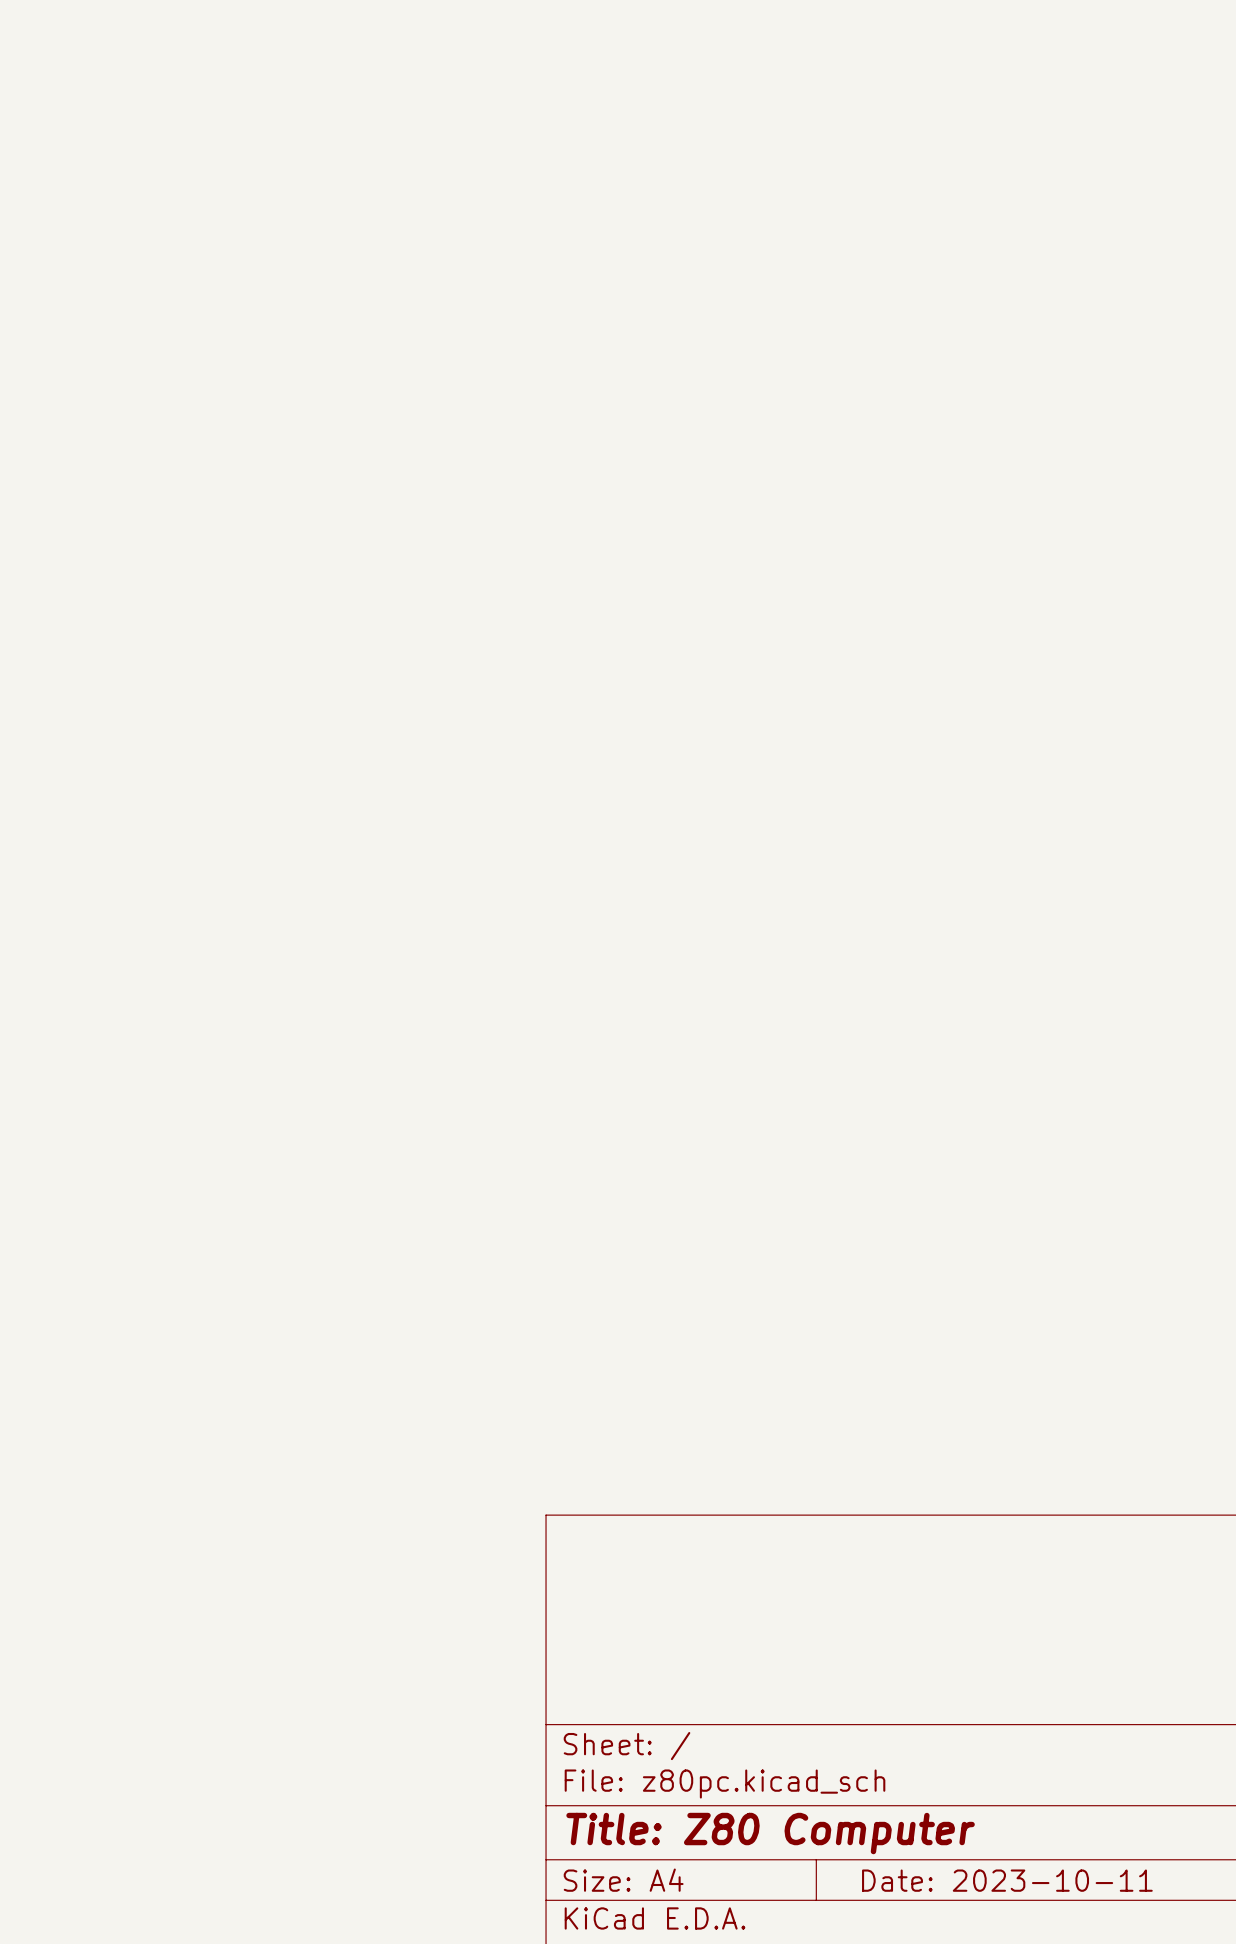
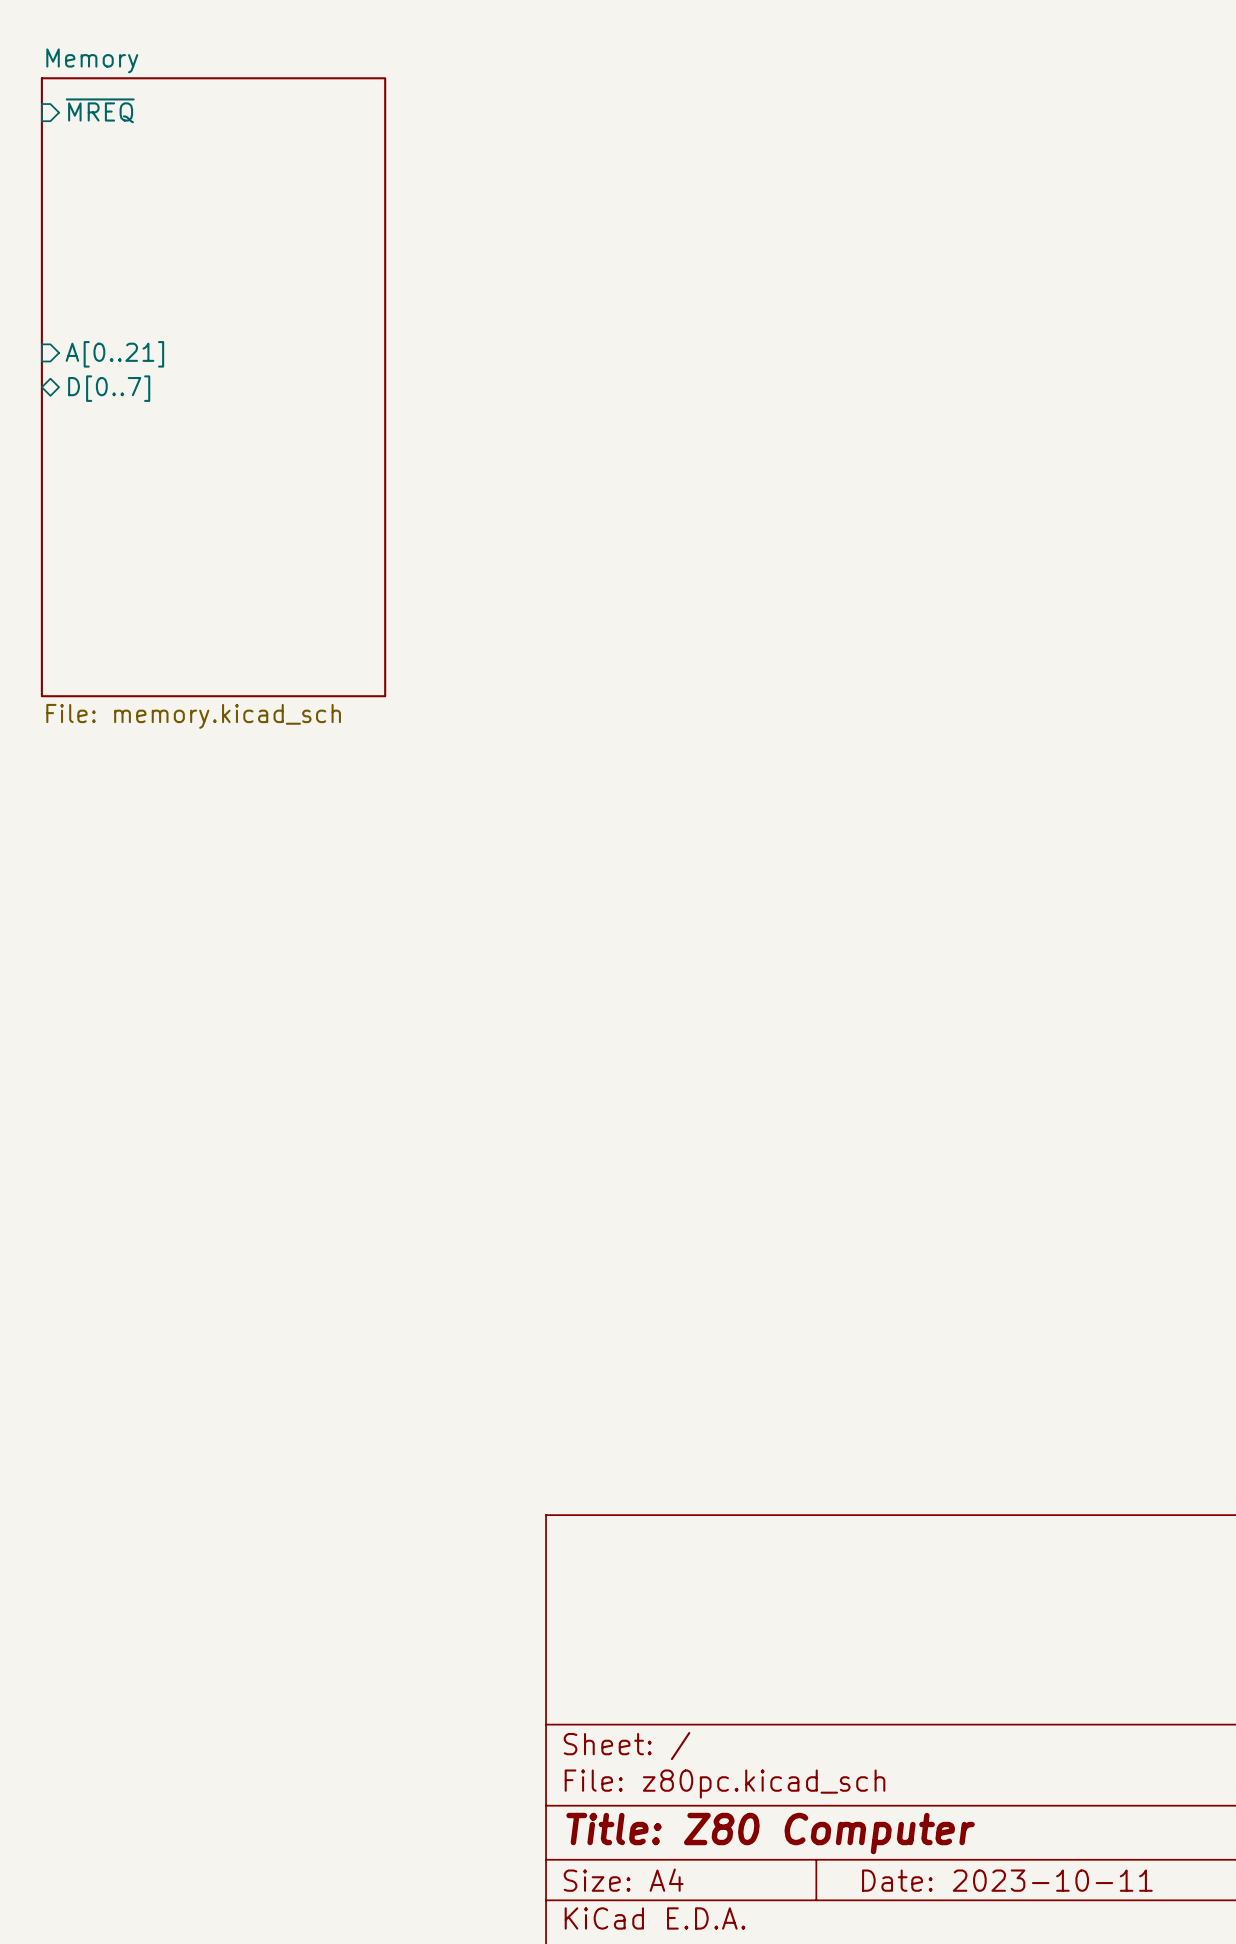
sheet pin: none -> ~{MREQ} (100, 110)
sheet pin: none -> A[0..21] (114, 354)
sheet Memory: none -> File: memory.kicad_sch (213, 387)
sheet pin: none -> D[0..7] (109, 388)

